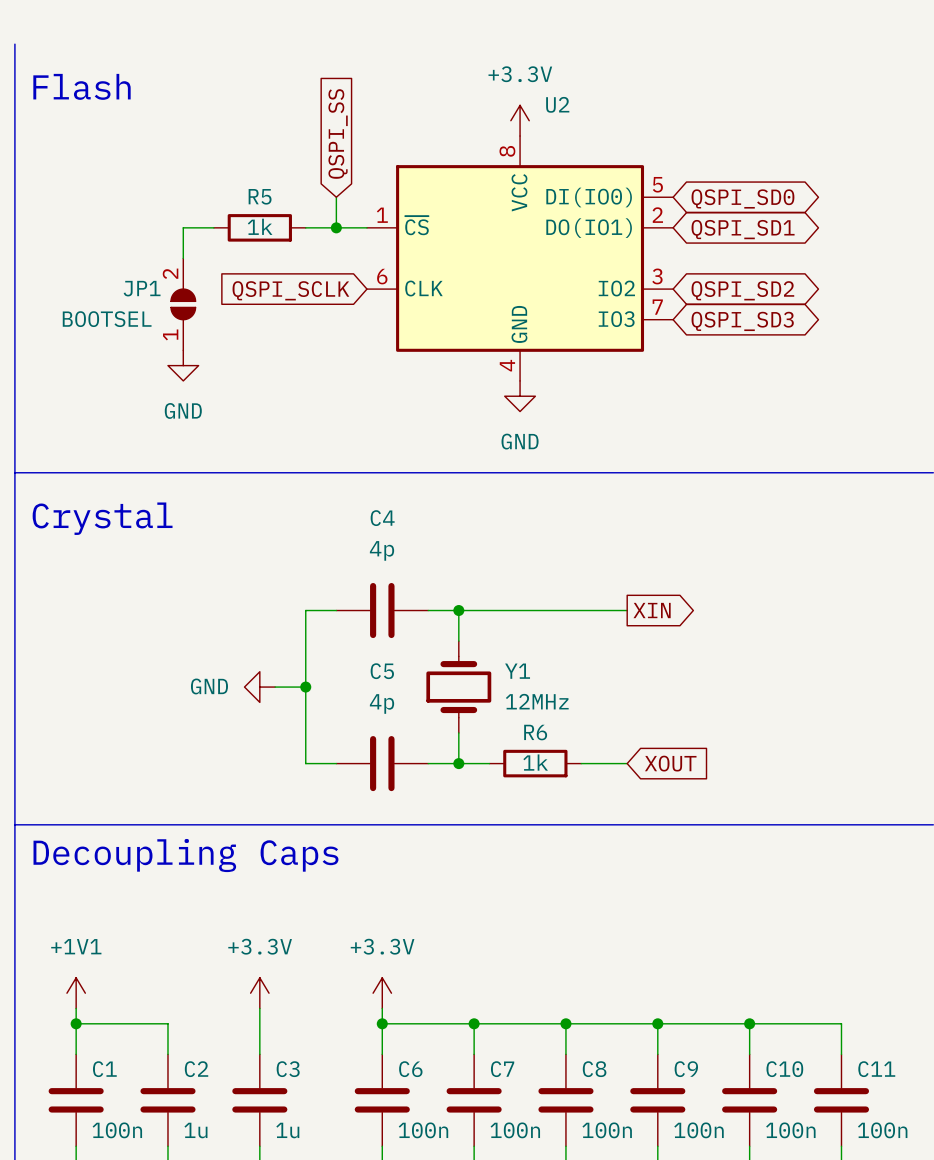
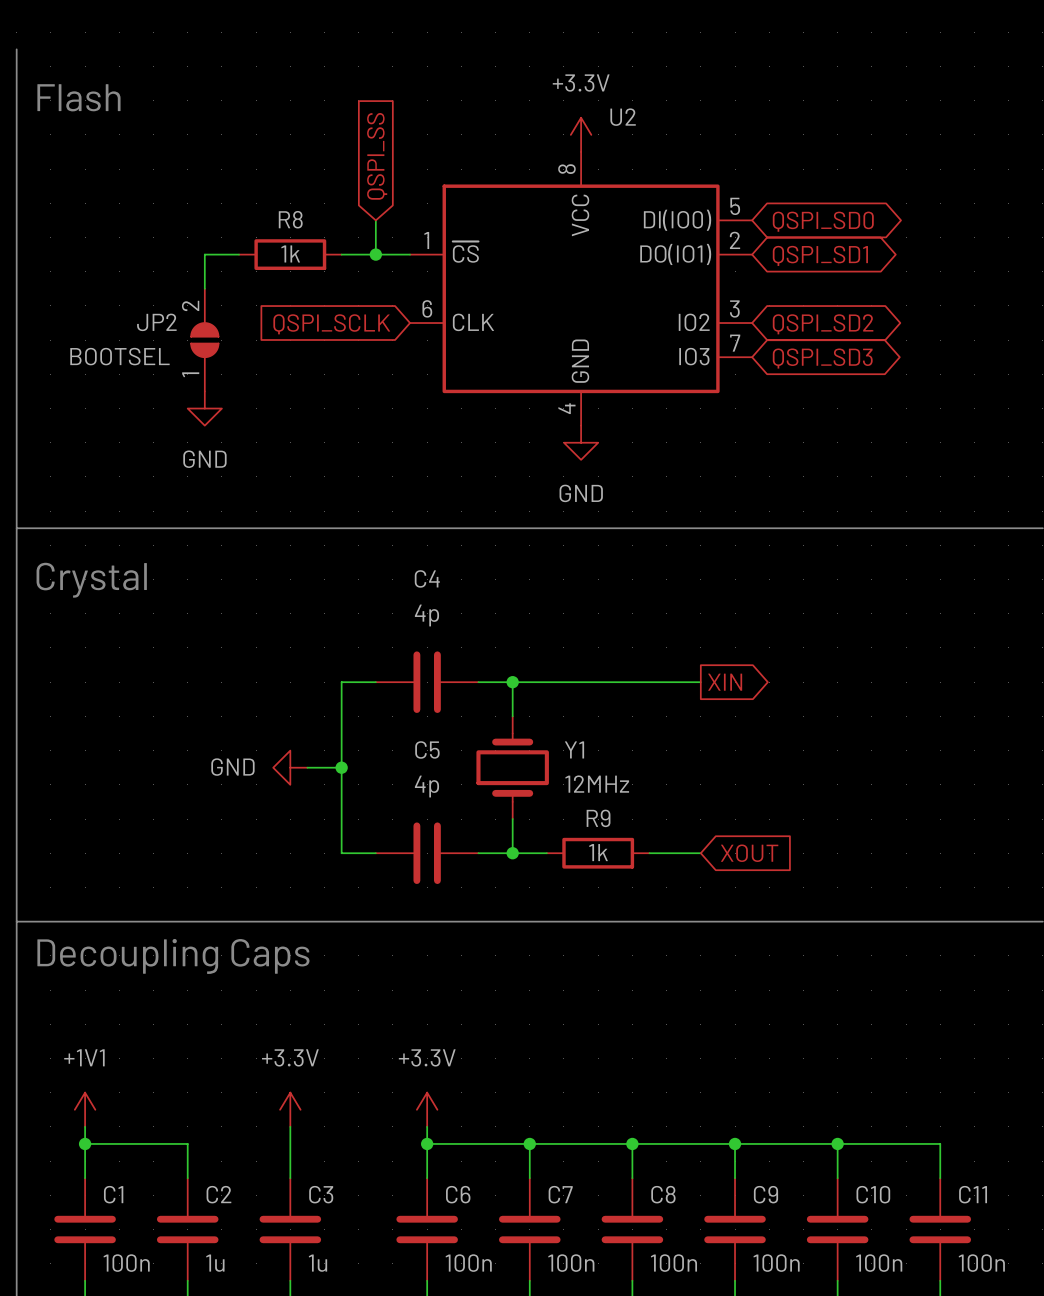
R5 name: R5 (260, 196) -> R8 (290, 219)
JP1 name: JP1 (142, 288) -> JP2 (156, 322)
R6 name: R6 (535, 732) -> R9 (598, 818)

